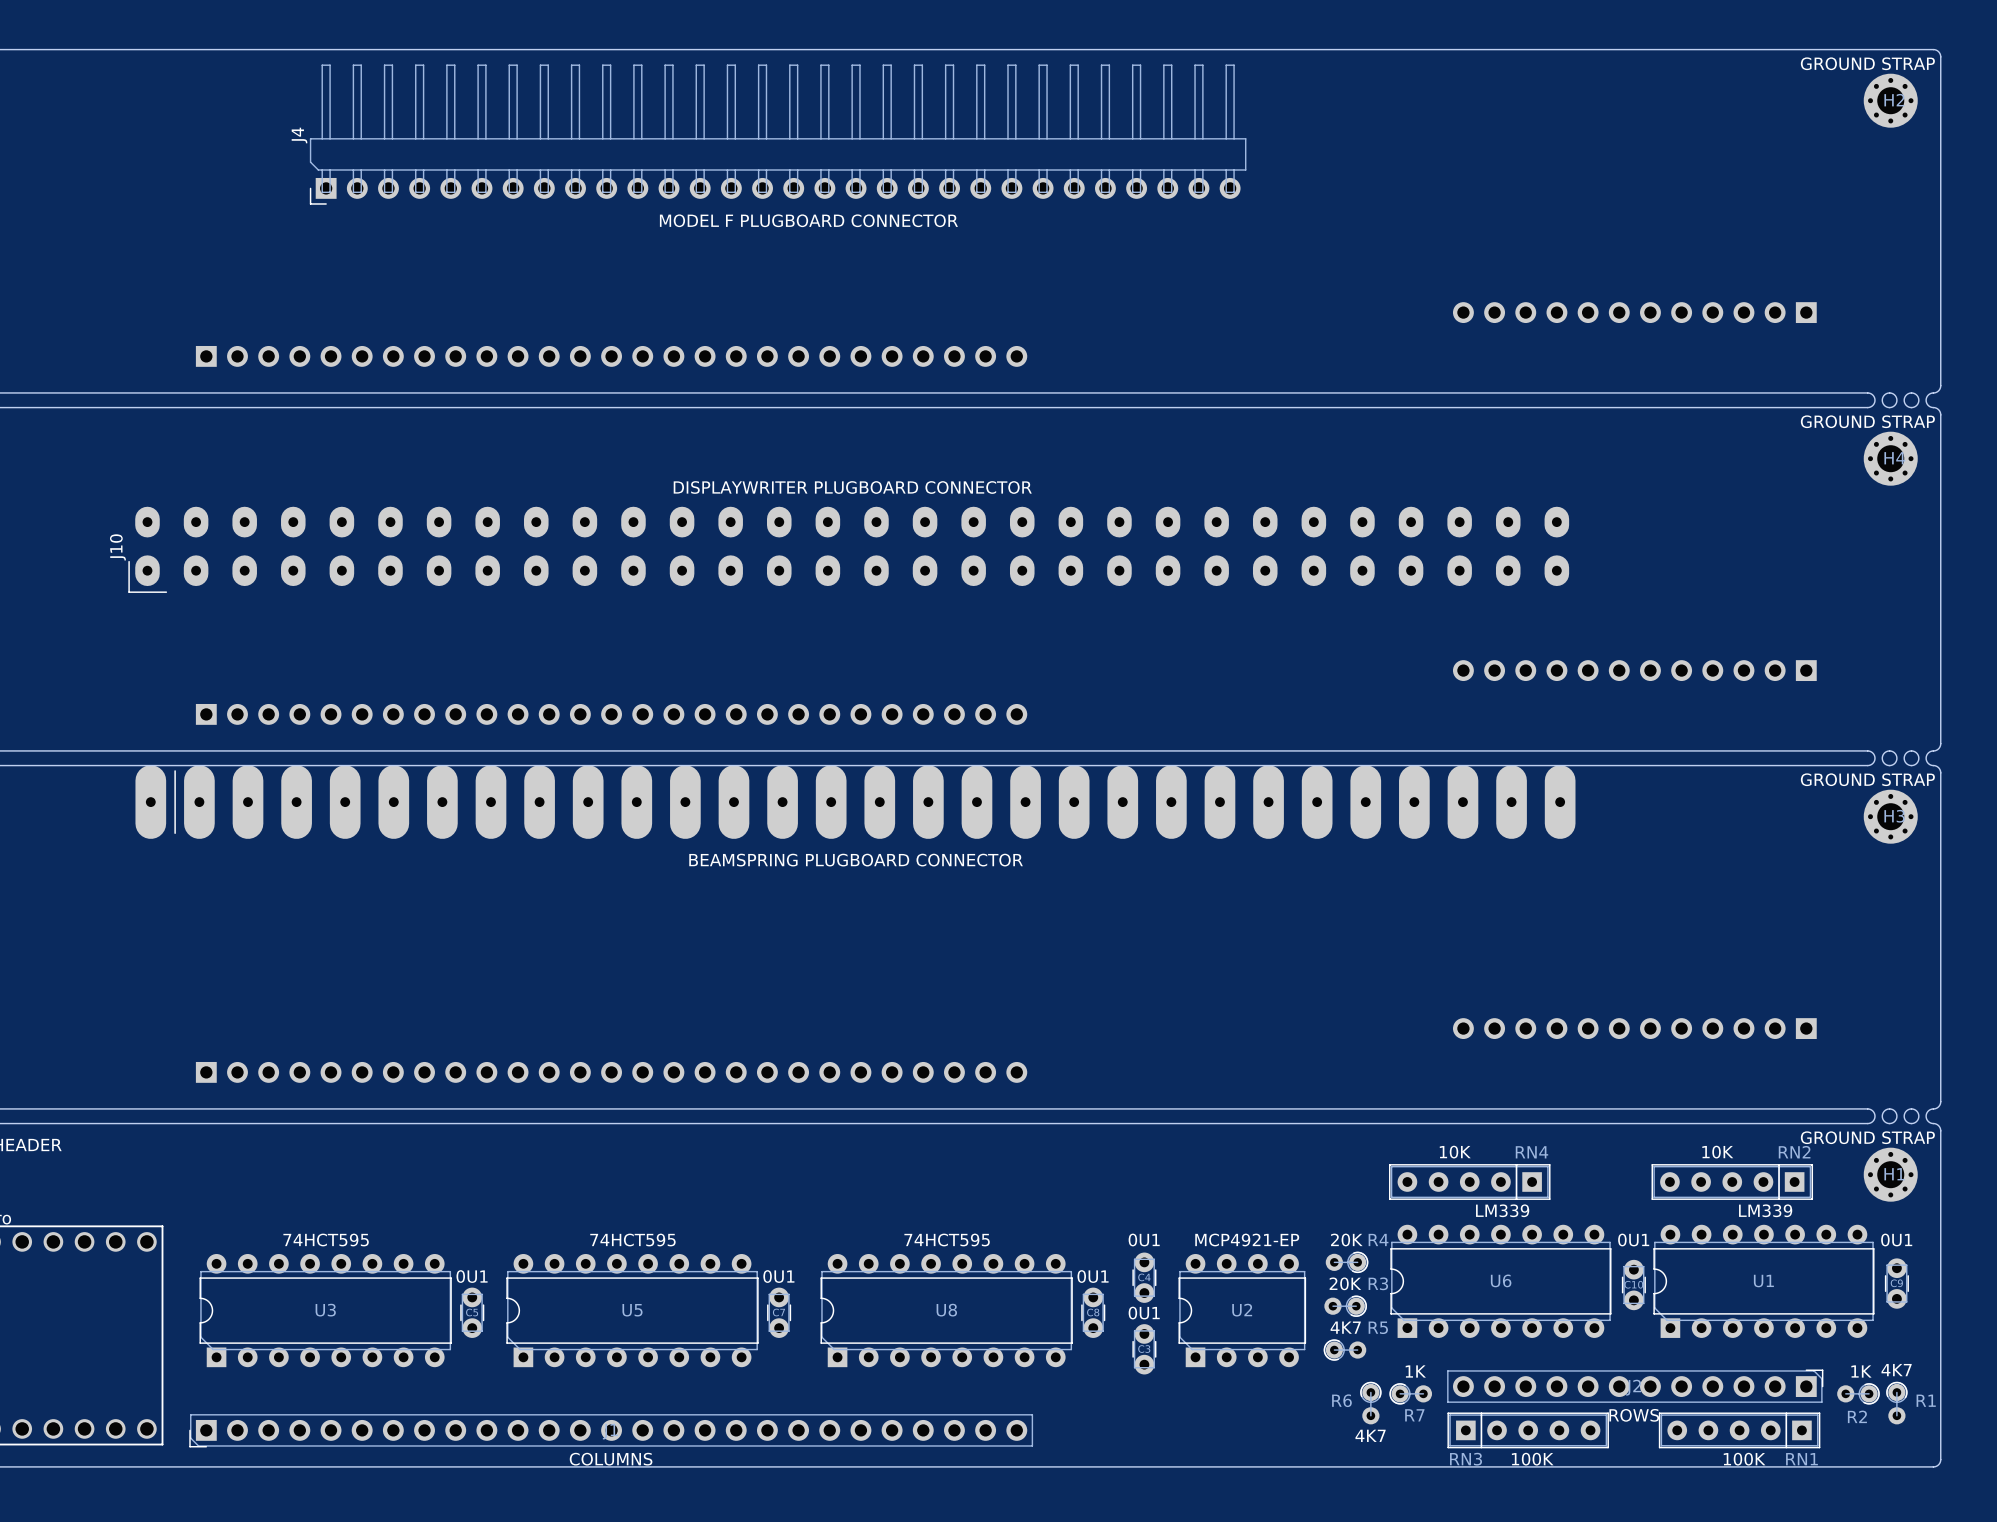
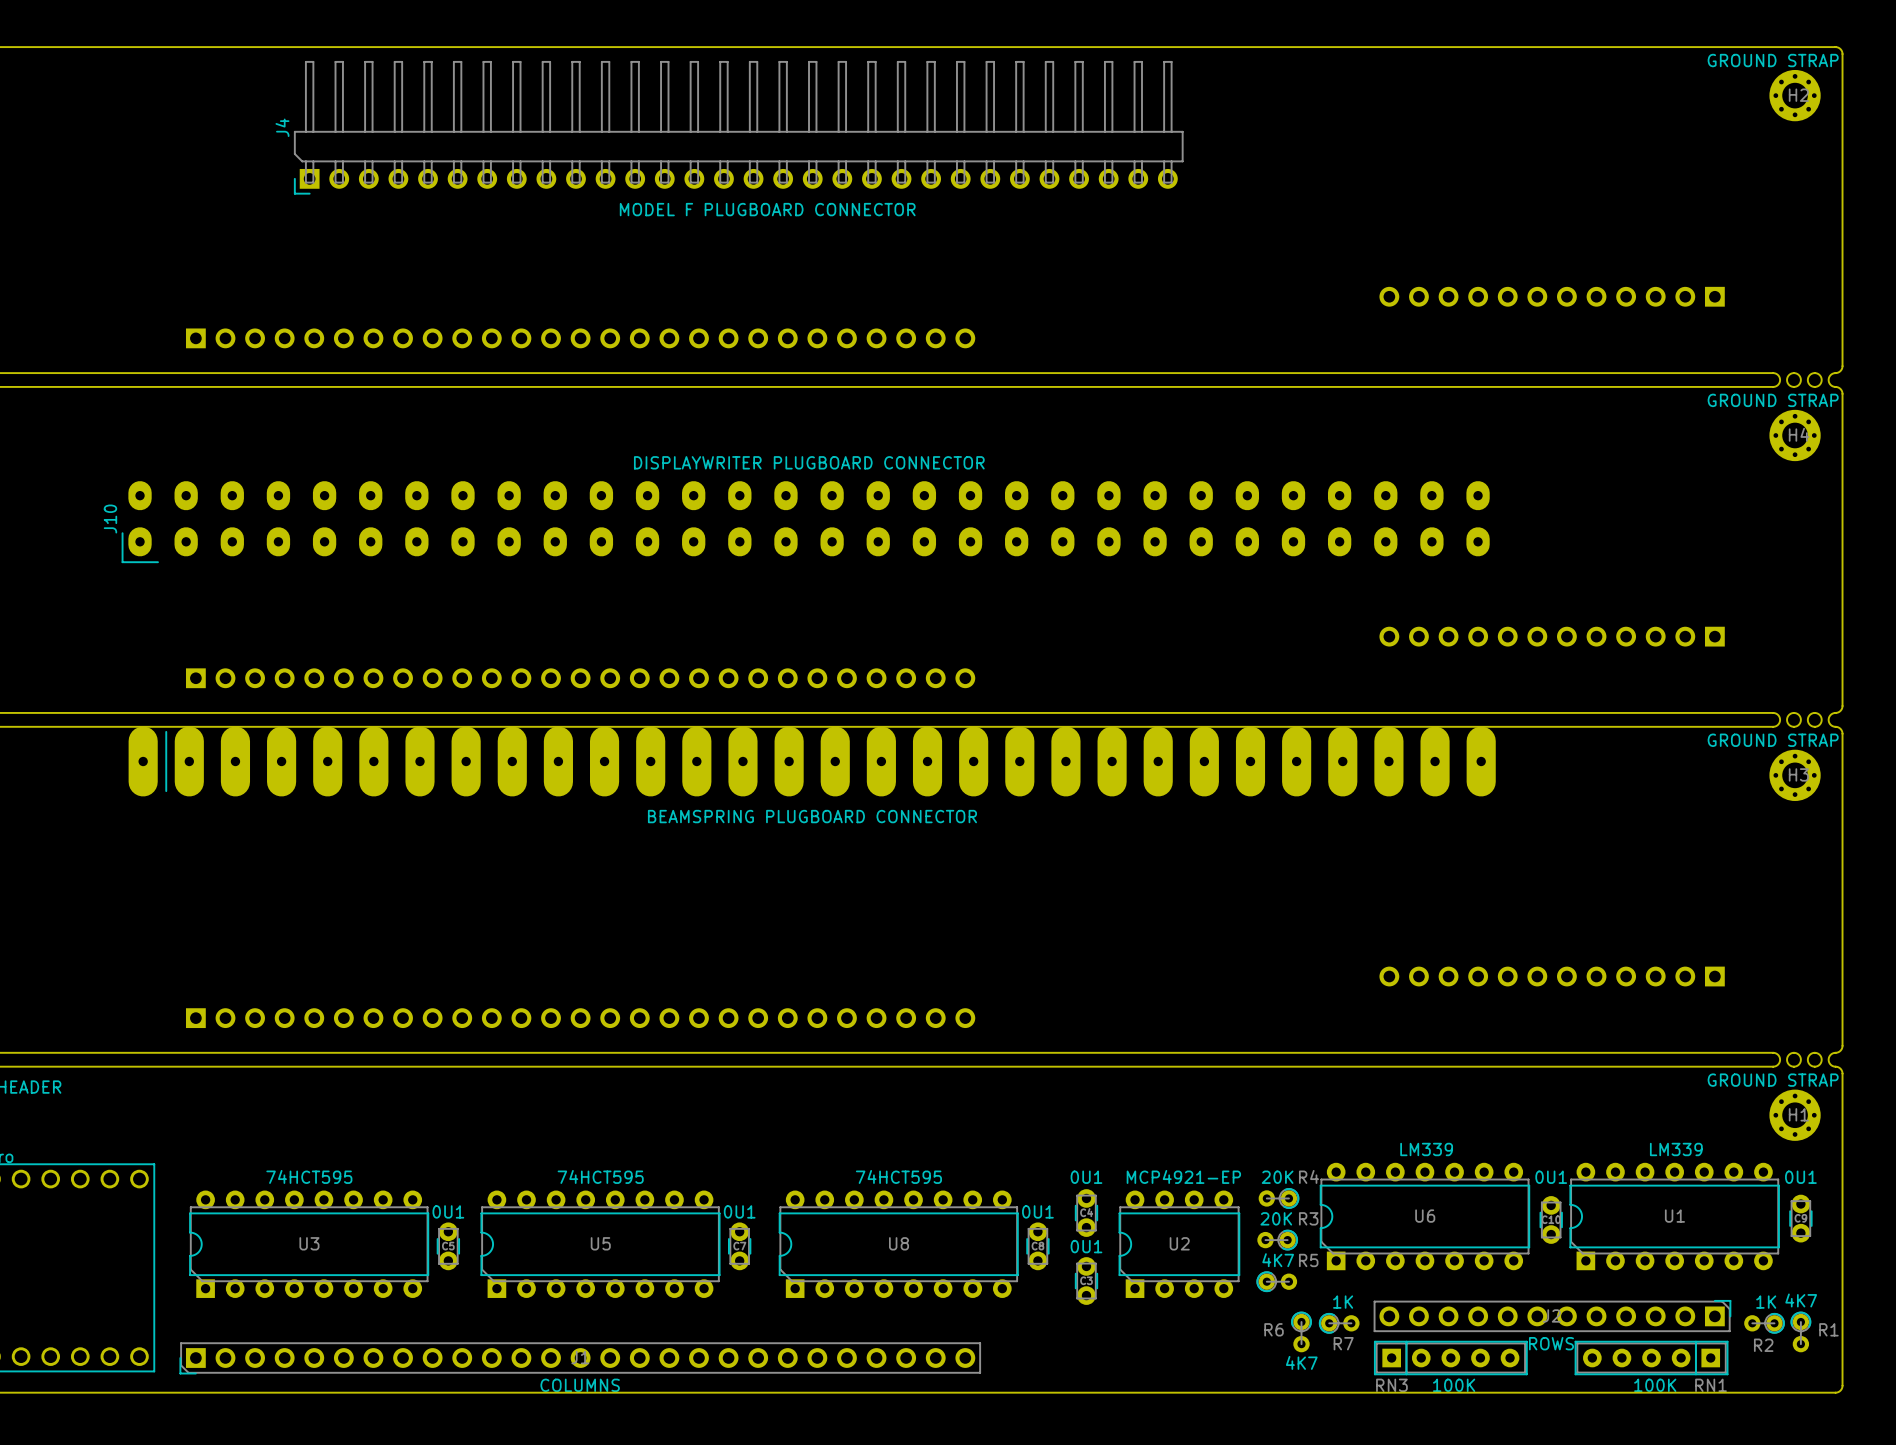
RN4: 10K (1469, 1182) -> none
RN2: 10K (1732, 1182) -> none

